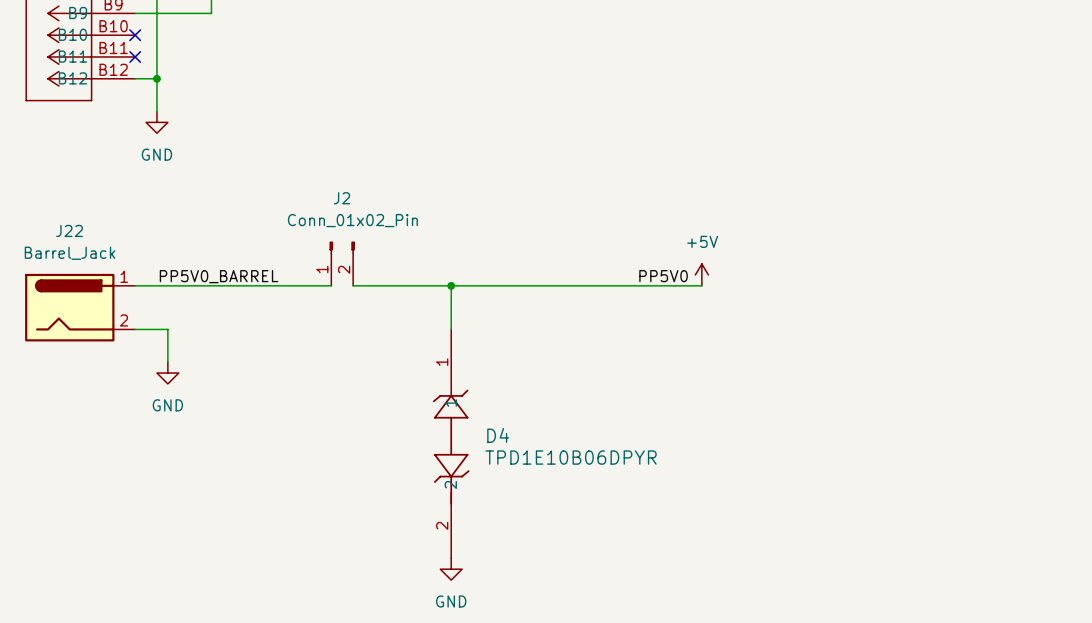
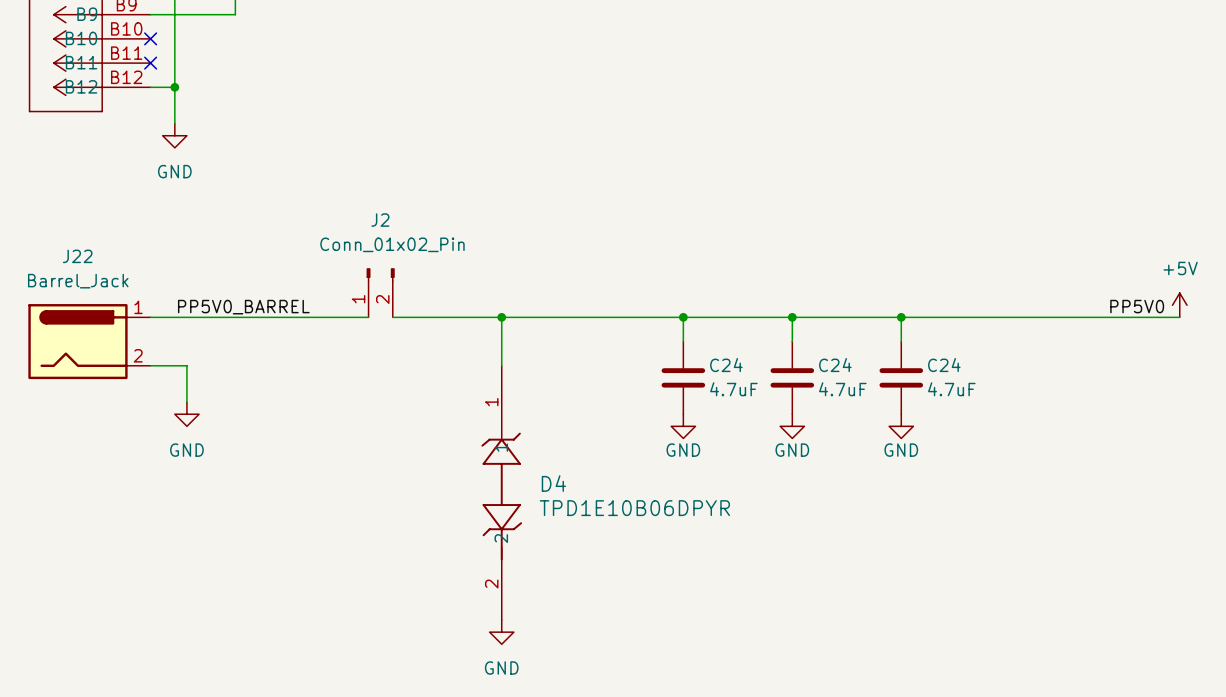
power symbol: +5V (701, 274) -> none
power symbol: none -> +5V (1179, 305)
label: PP5V0 (663, 276) -> none
label: none -> PP5V0 (1137, 306)
wire: none -> (683, 317) (683, 341)
junction: none -> (683, 317)
wire: none -> (780, 317) (1179, 317)
wire: none -> (792, 317) (792, 341)
junction: none -> (792, 317)
wire: none -> (901, 317) (901, 341)
junction: none -> (901, 317)
C24: none -> 4.7uF (683, 377)
C24: none -> 4.7uF (792, 377)
C24: none -> 4.7uF (901, 377)
power symbol: none -> GND (683, 426)
power symbol: none -> GND (792, 426)
power symbol: none -> GND (901, 426)

